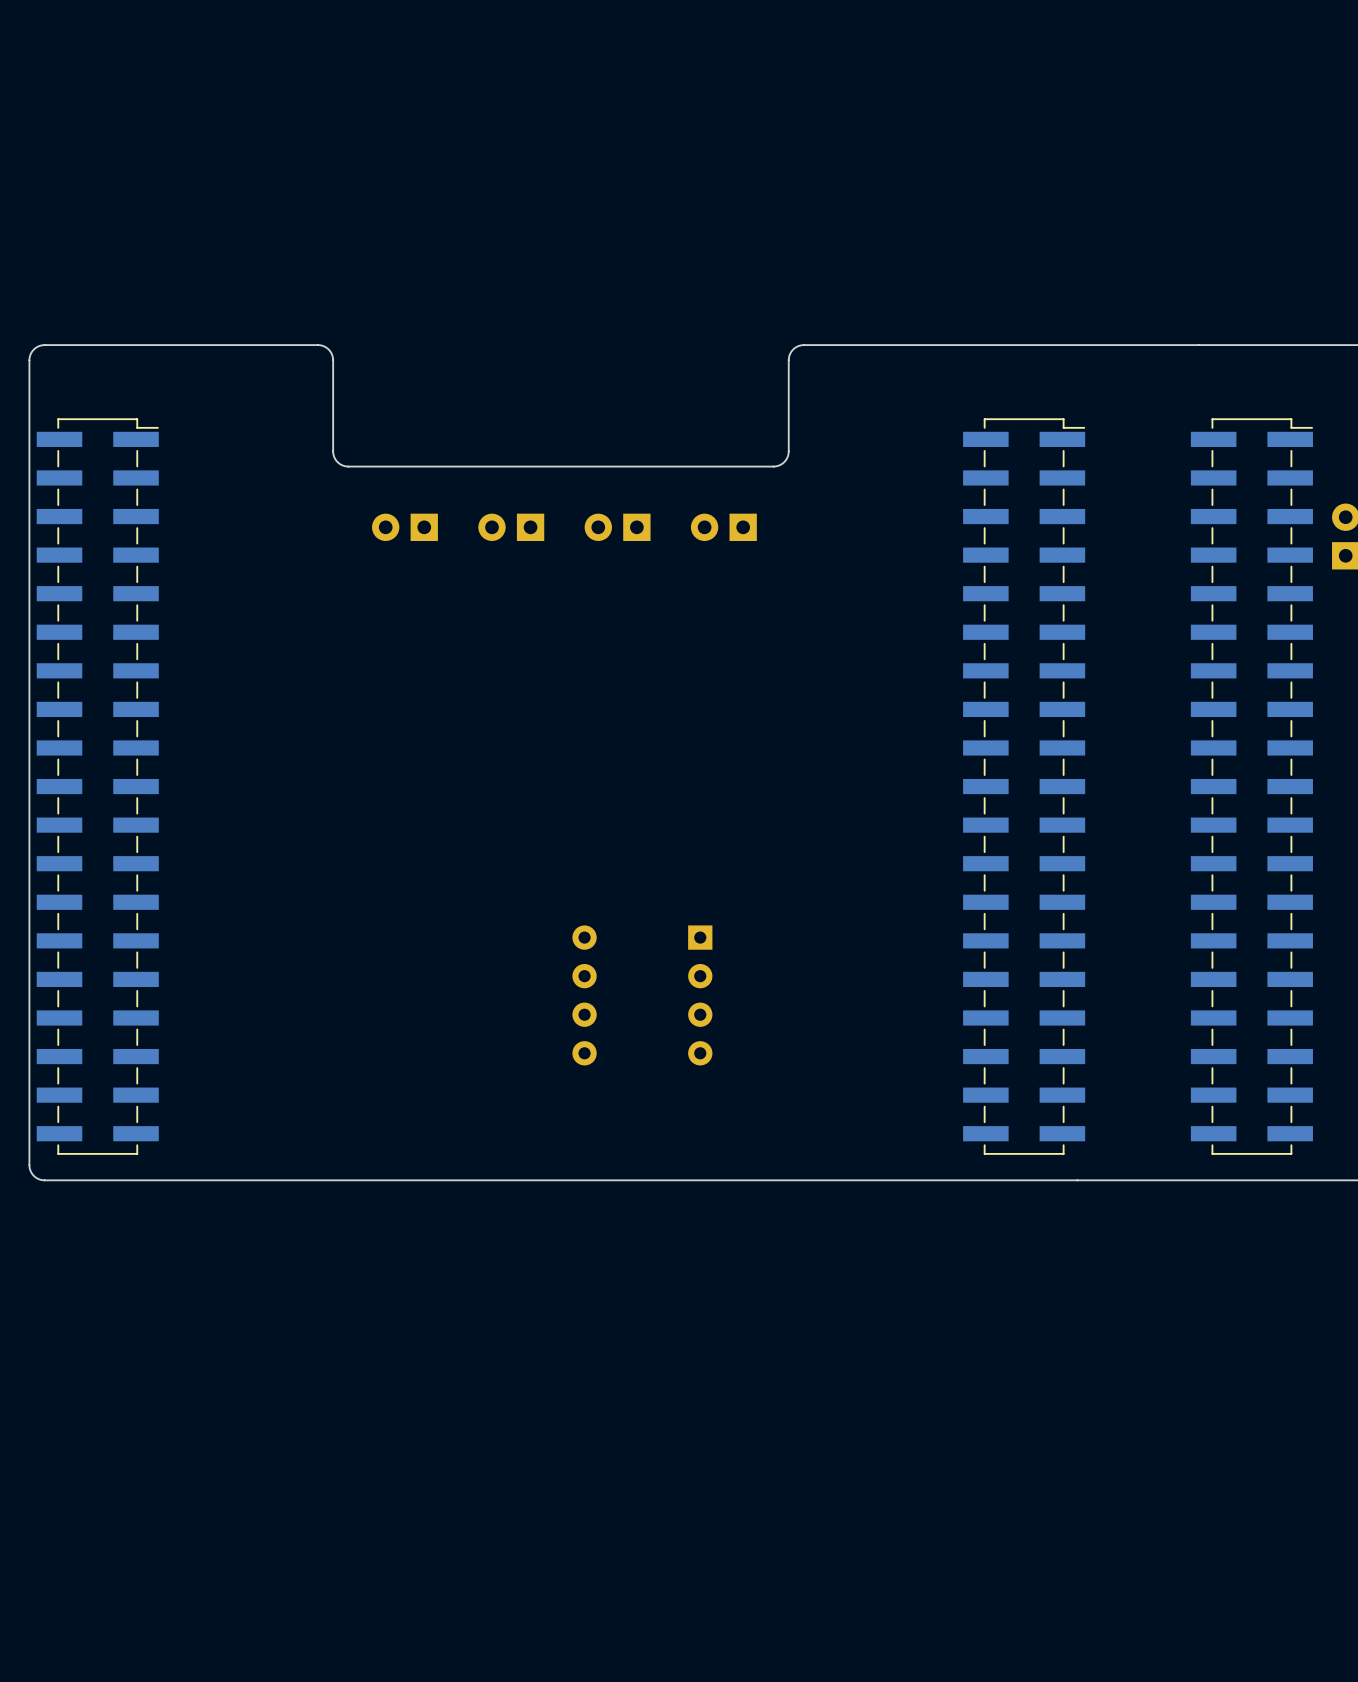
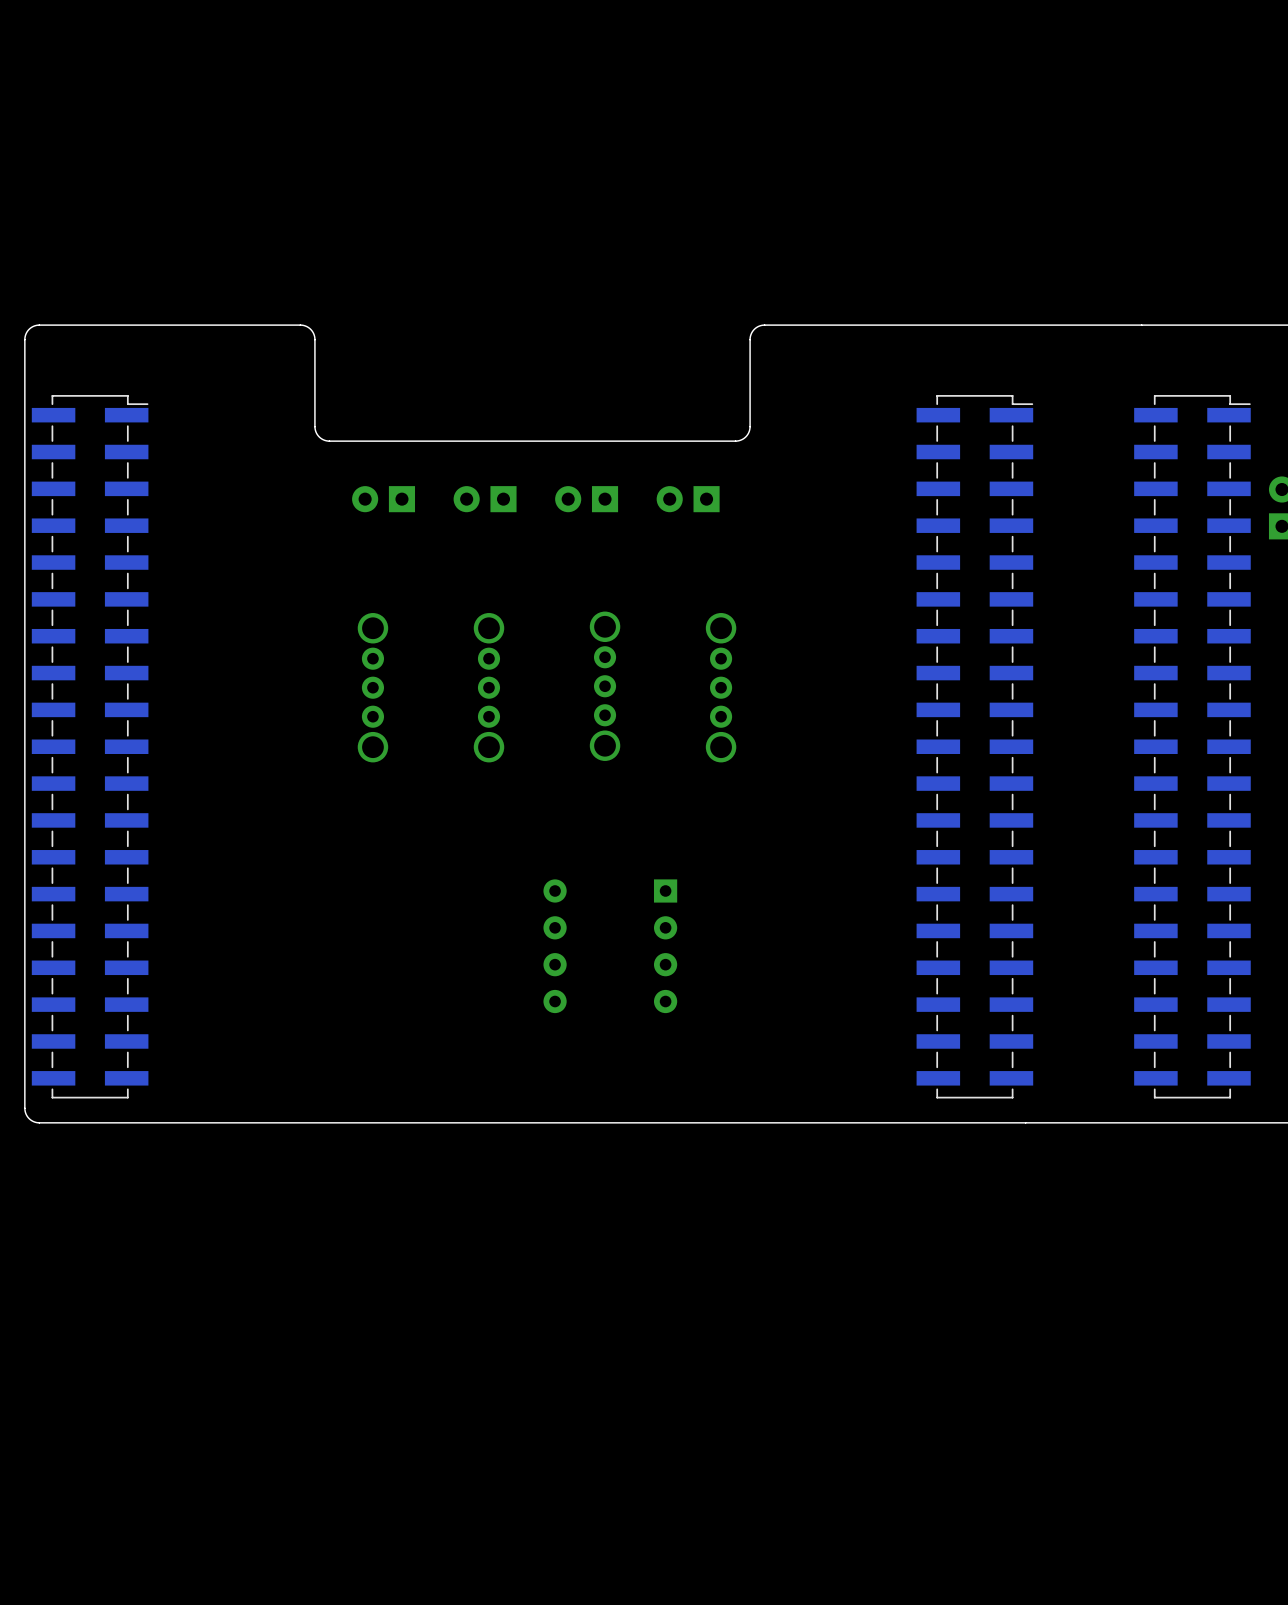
part: none -> (605, 686)
part: none -> (372, 687)
part: none -> (488, 687)
part: none -> (721, 687)

